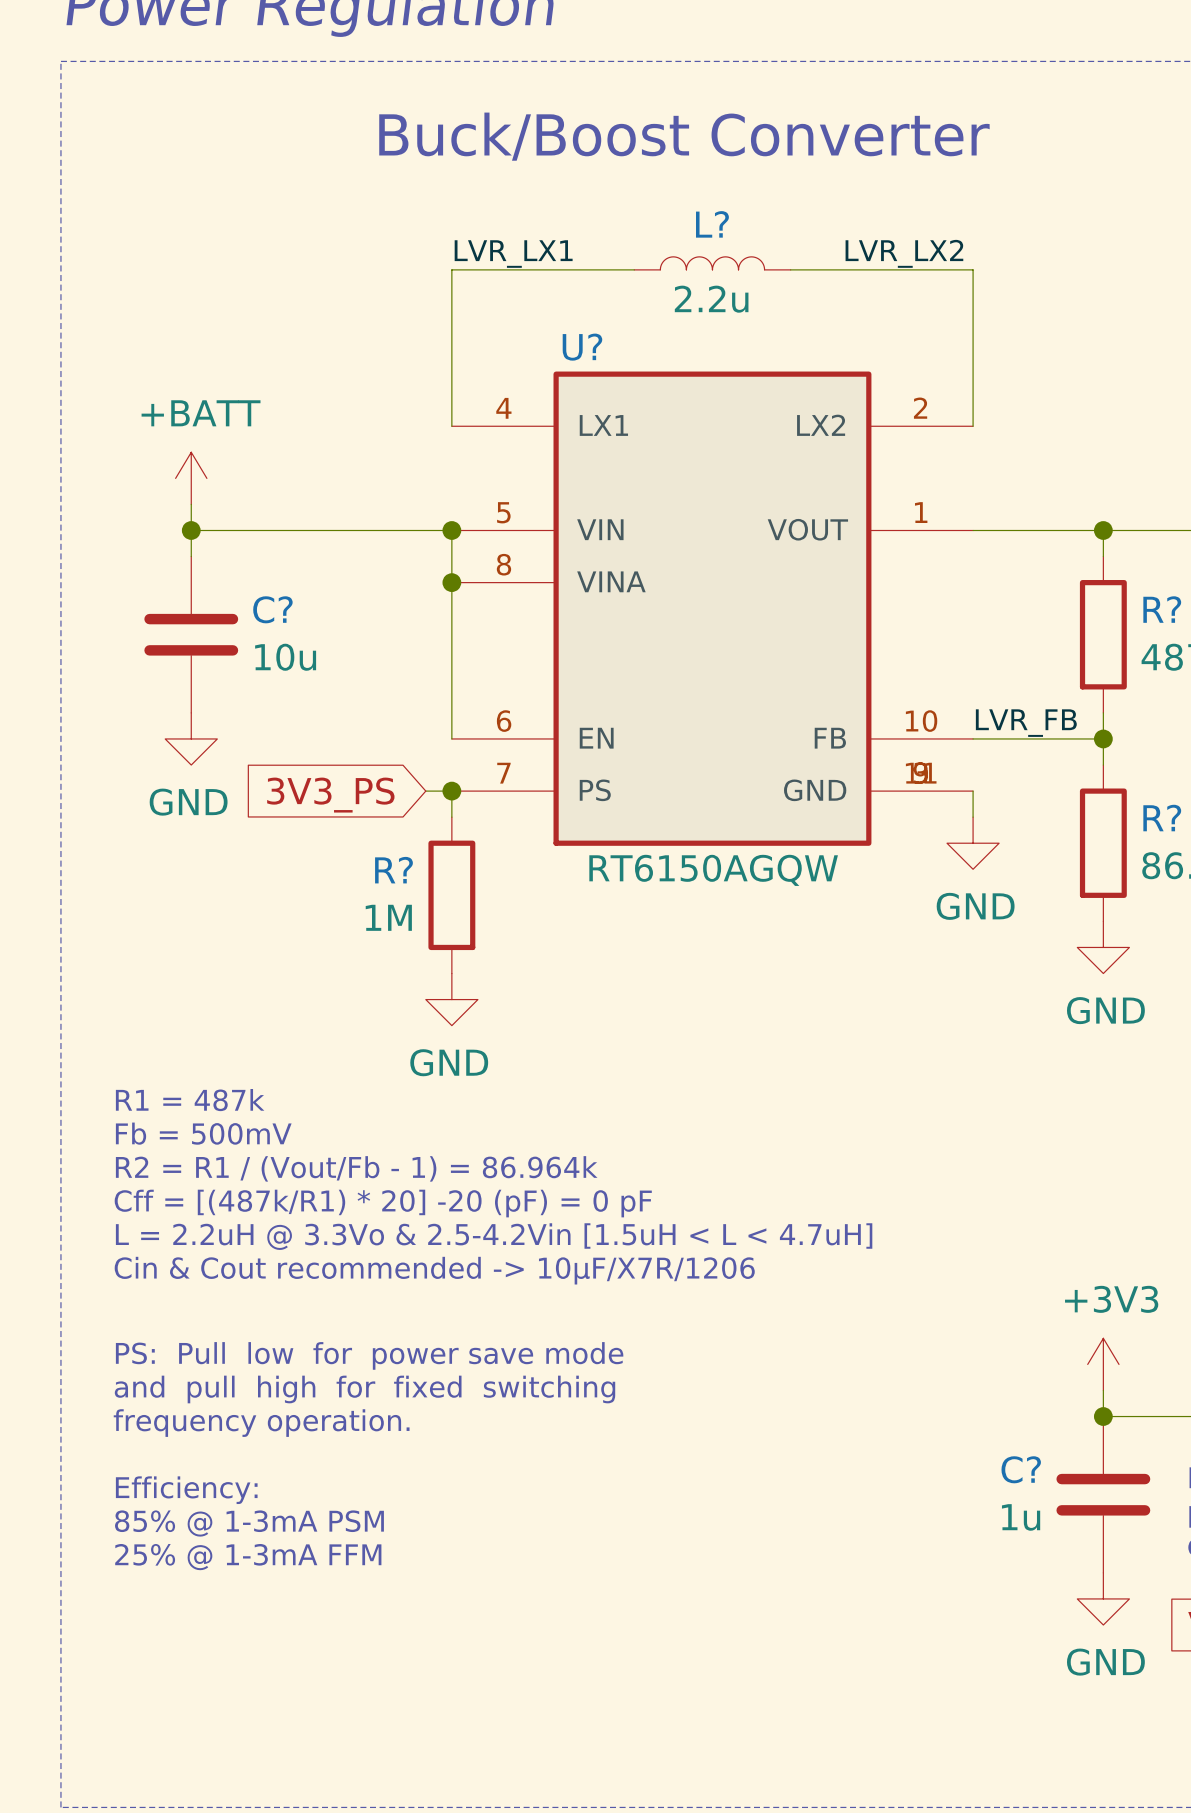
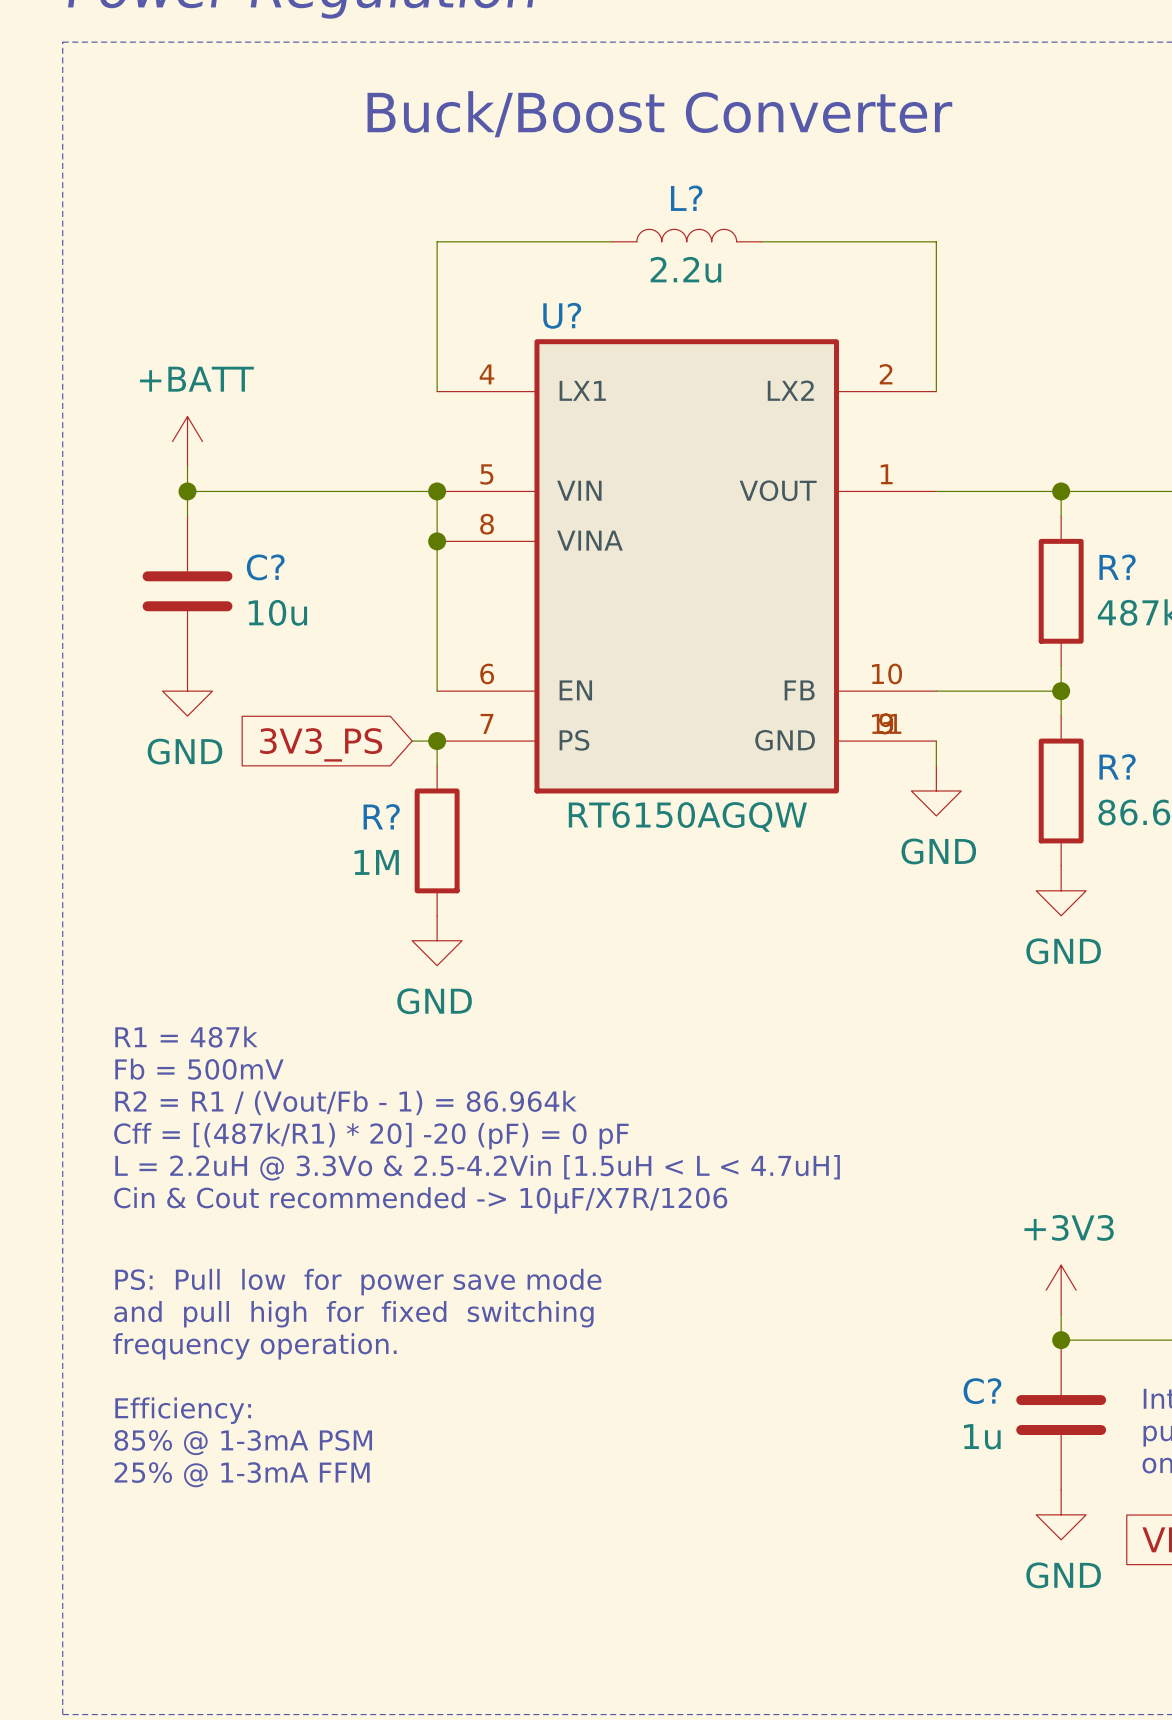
label: LVR_LX2 (904, 253) -> none
label: LVR_LX1 (513, 254) -> none
label: LVR_FB (1026, 723) -> none

